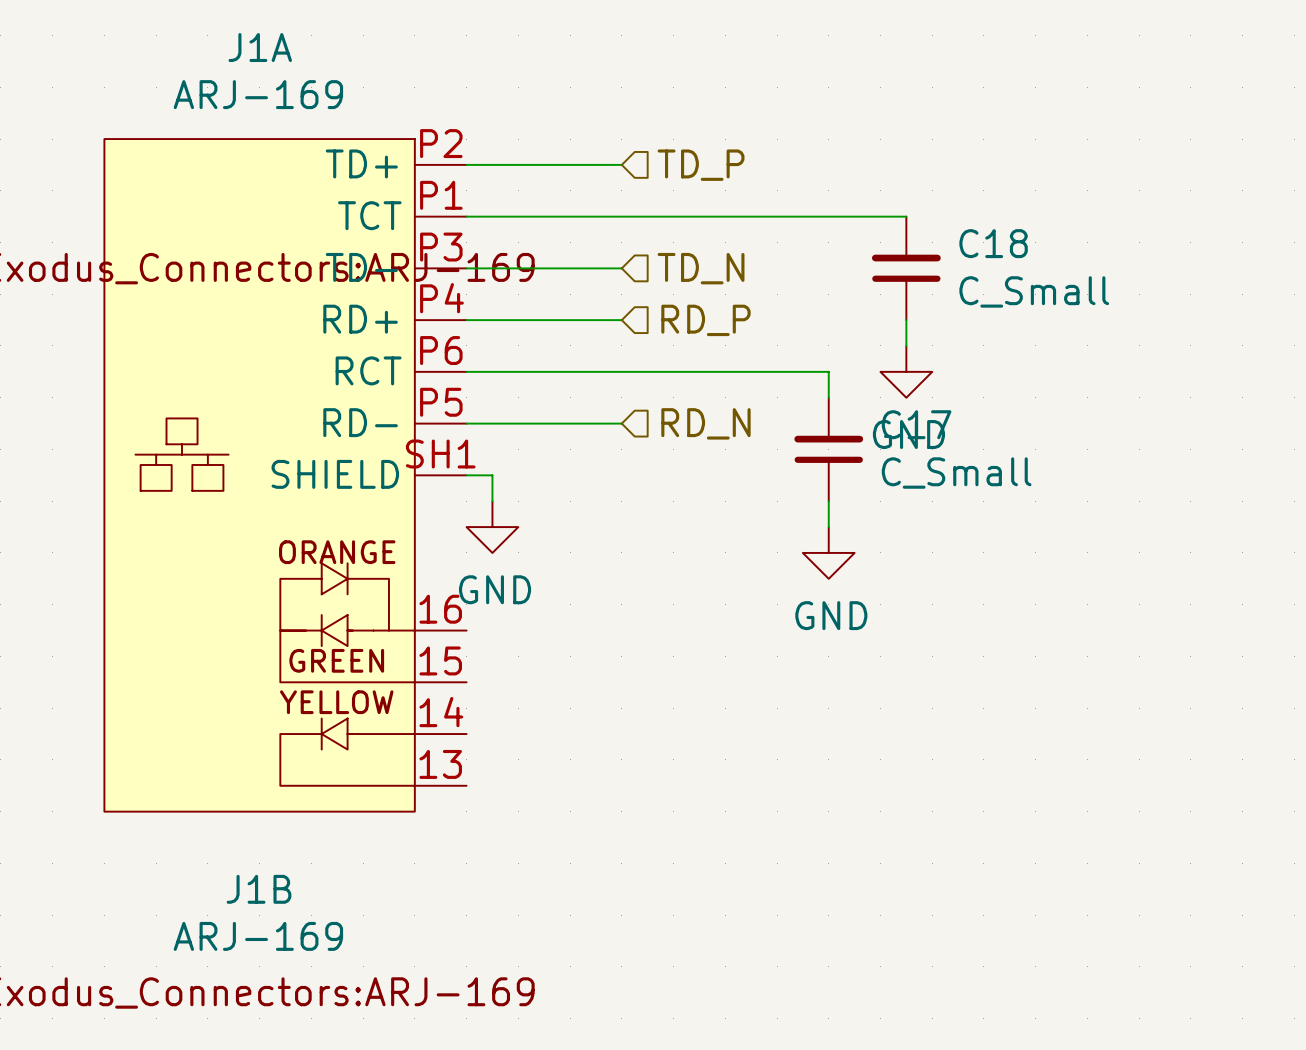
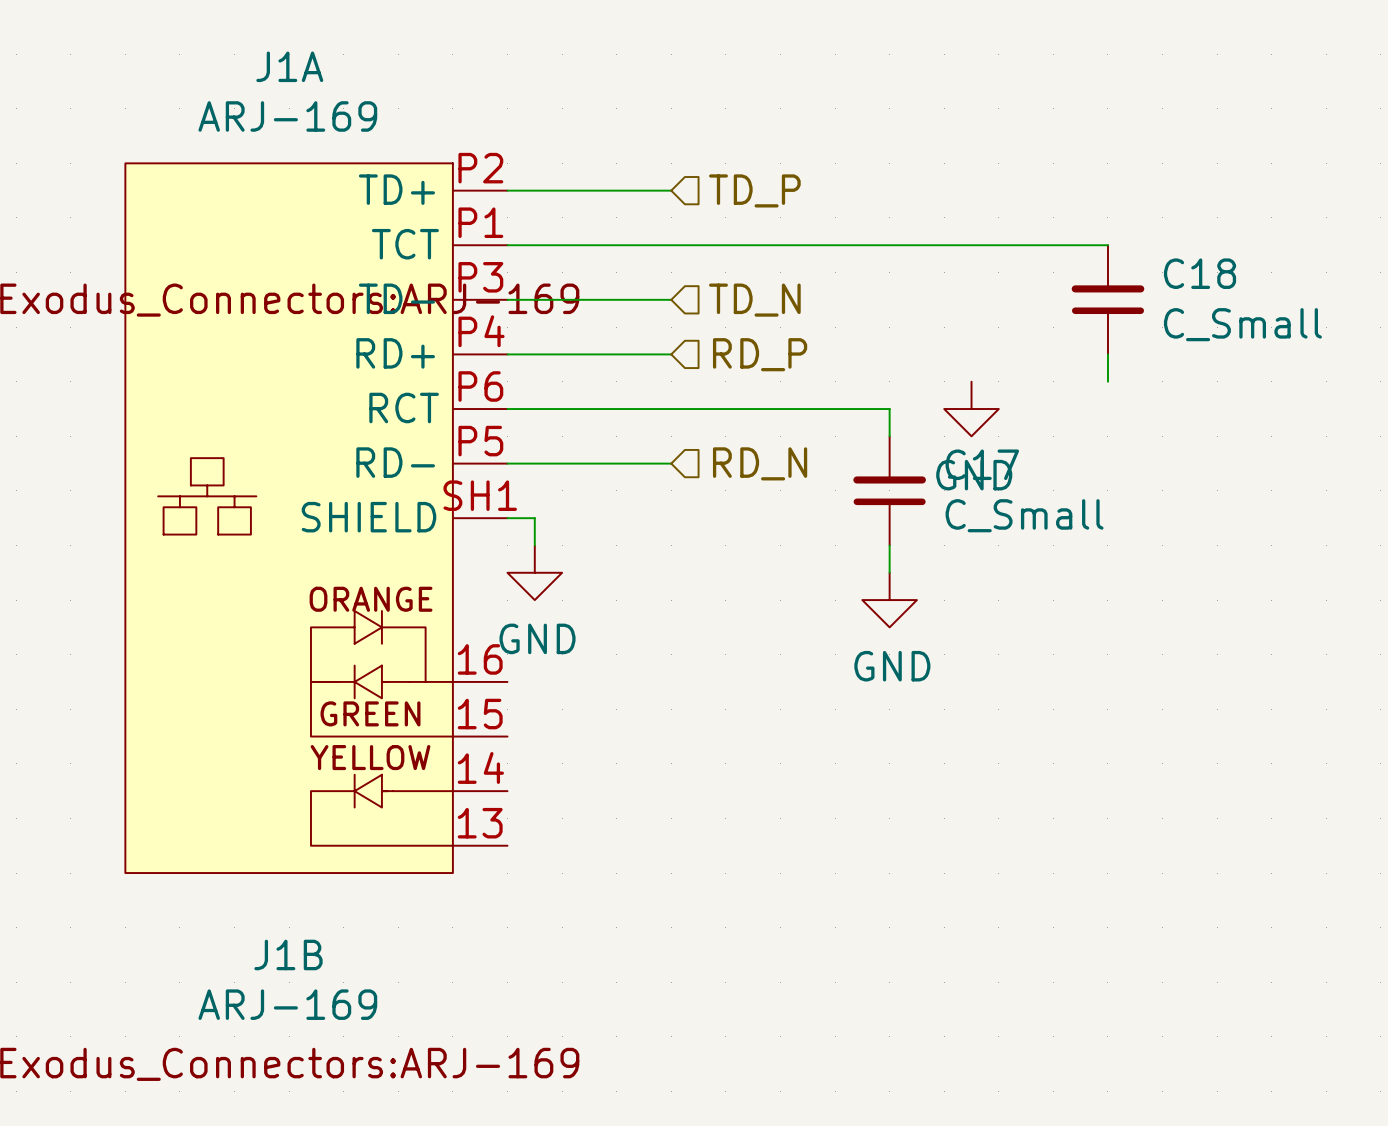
wire: none -> (971, 245) (1107, 245)
C18 position: (906, 268) -> (1107, 299)
wire: (906, 320) (906, 345) -> (1107, 354) (1107, 381)

